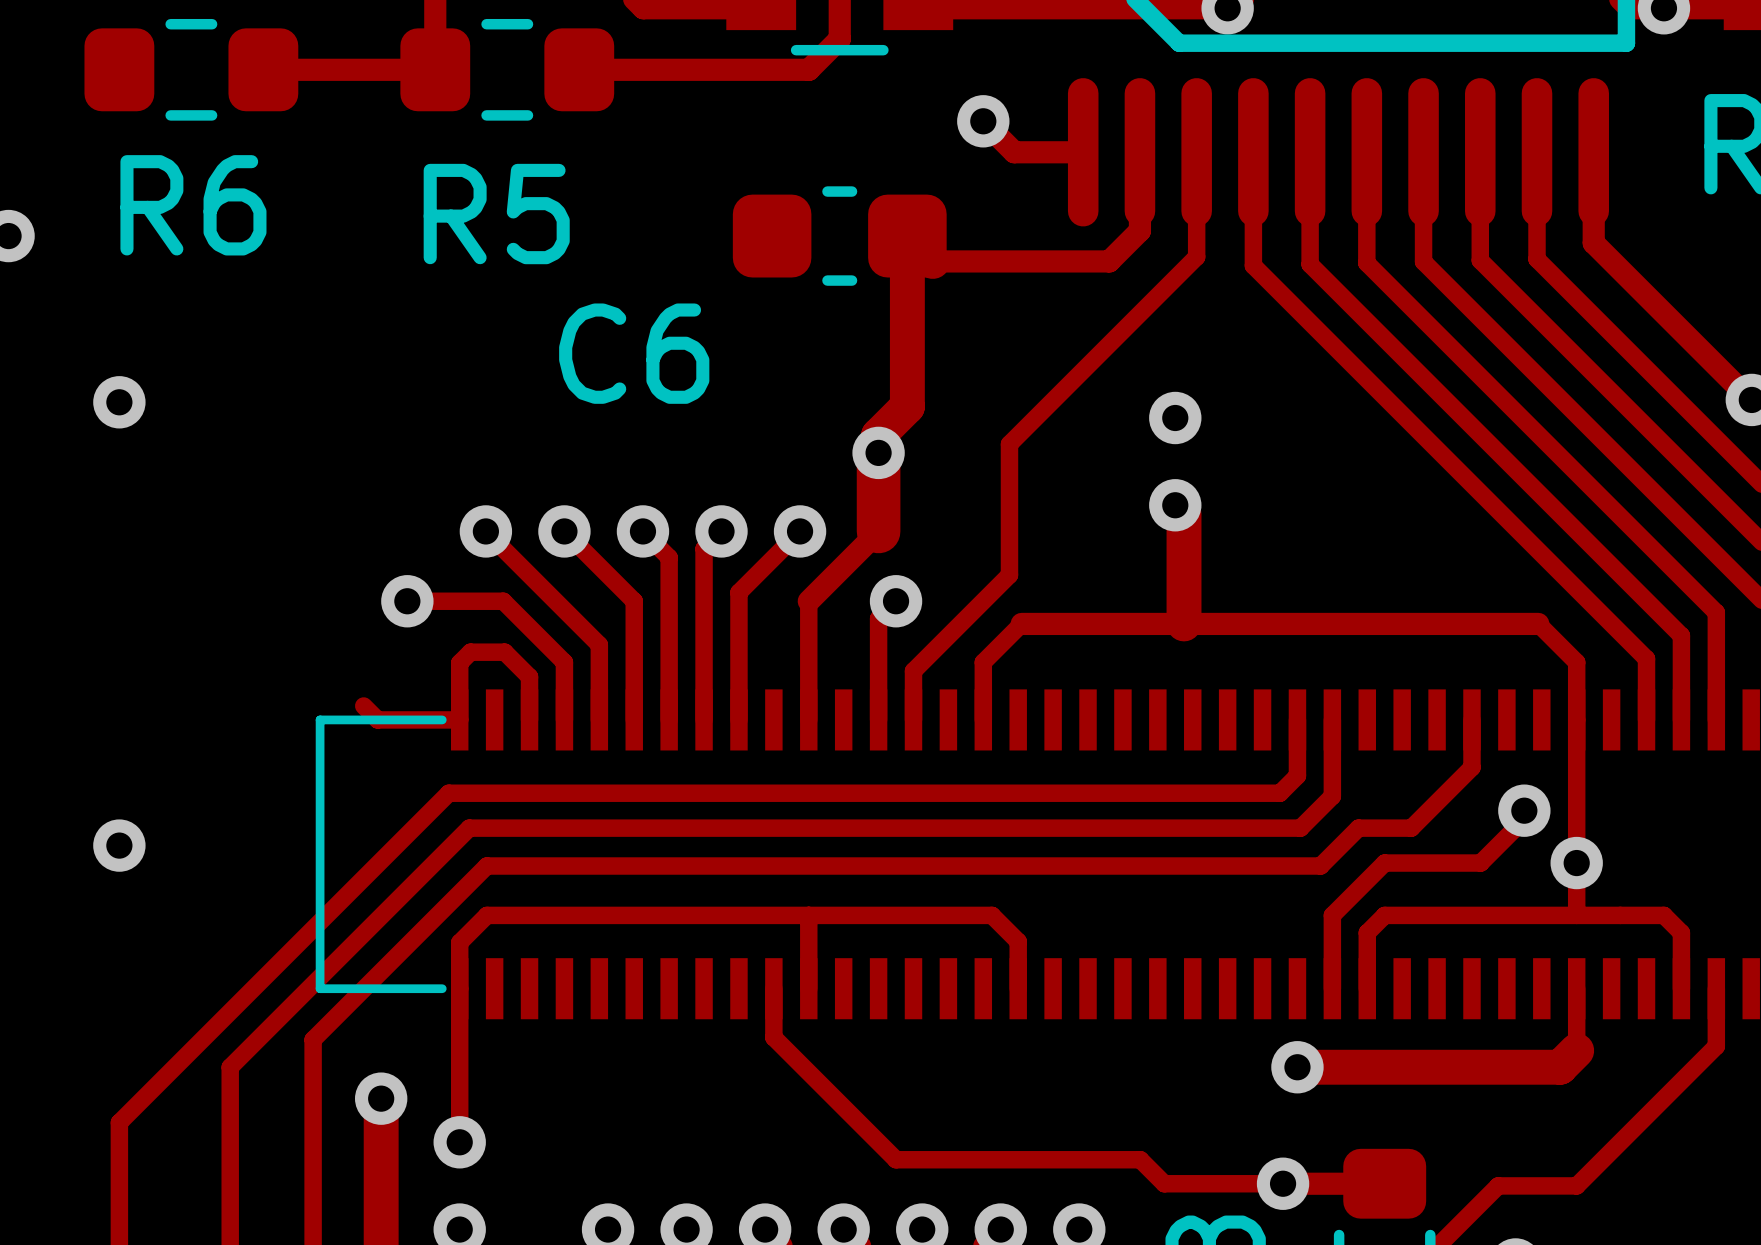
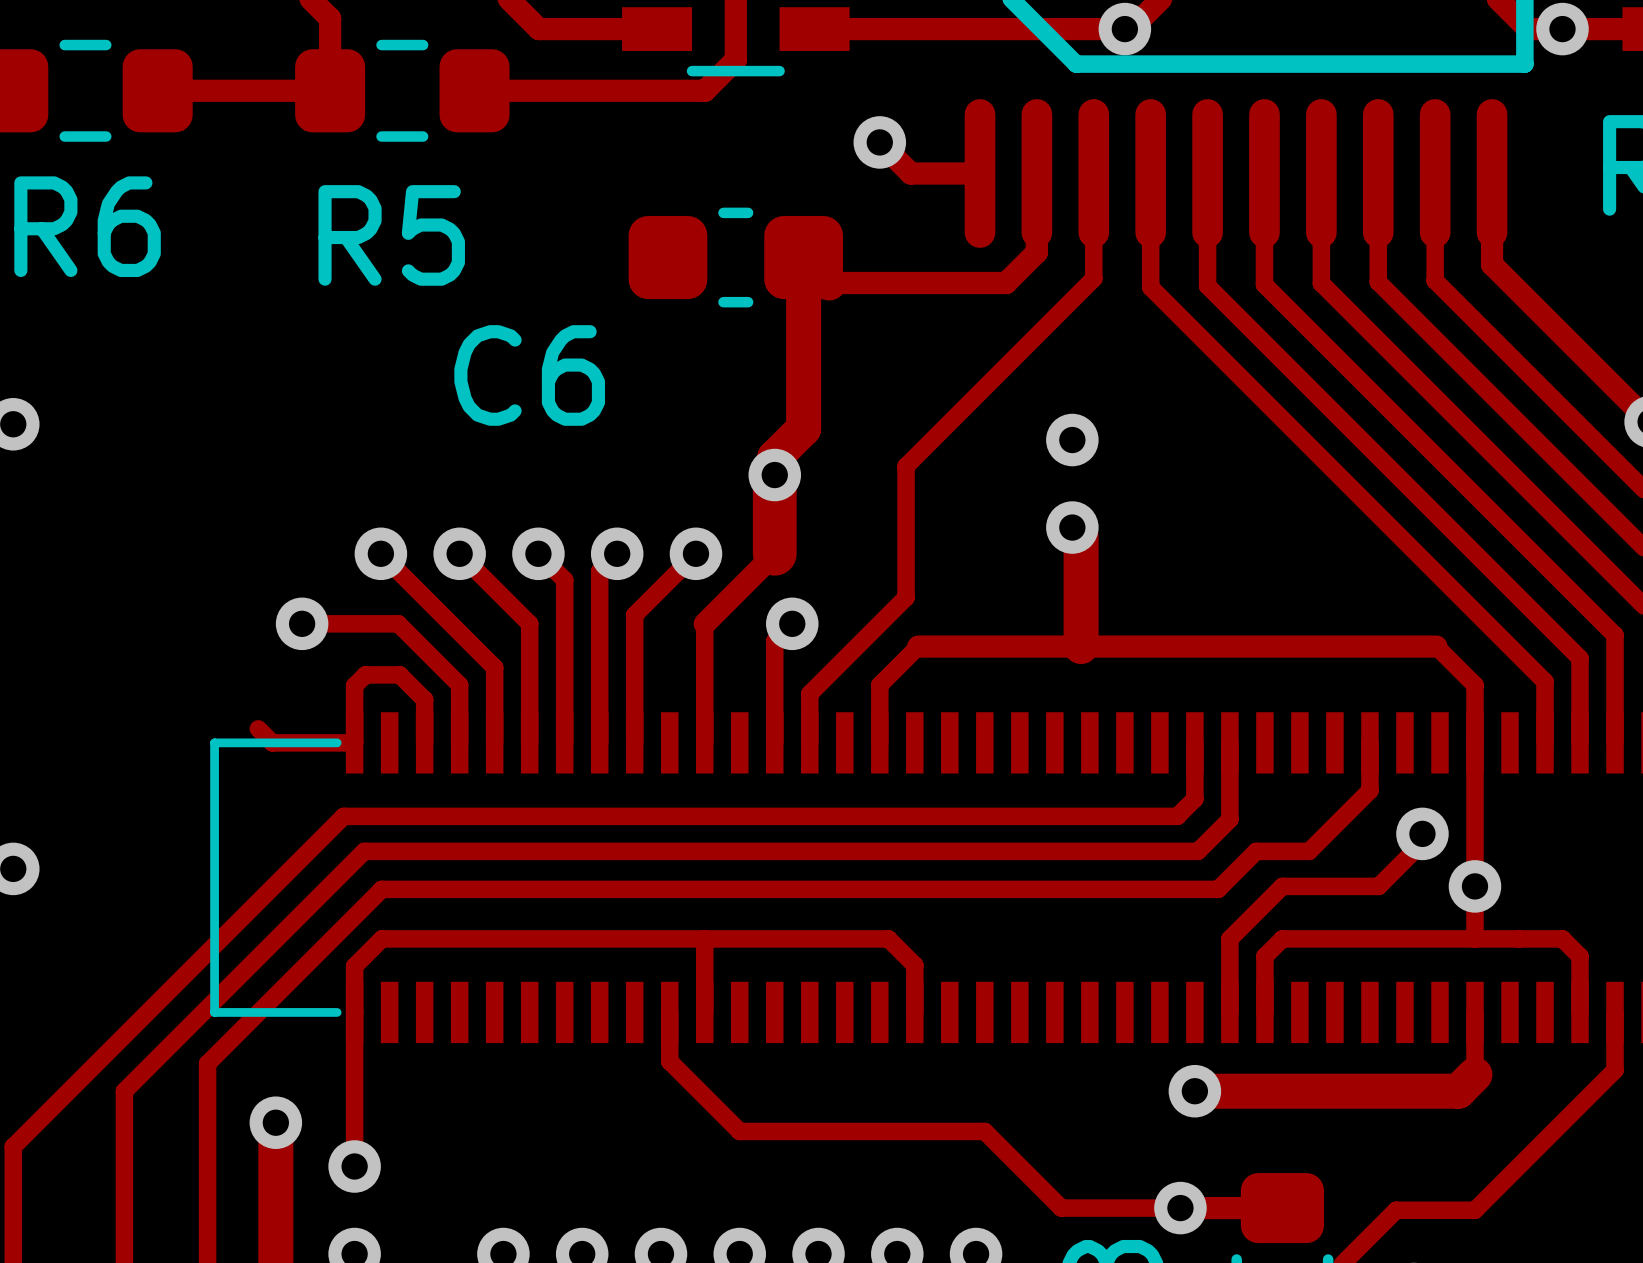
track: (843, 1107) (896, 1159) (1140, 1159) -> (739, 1131) (984, 1131) (1037, 1184)

